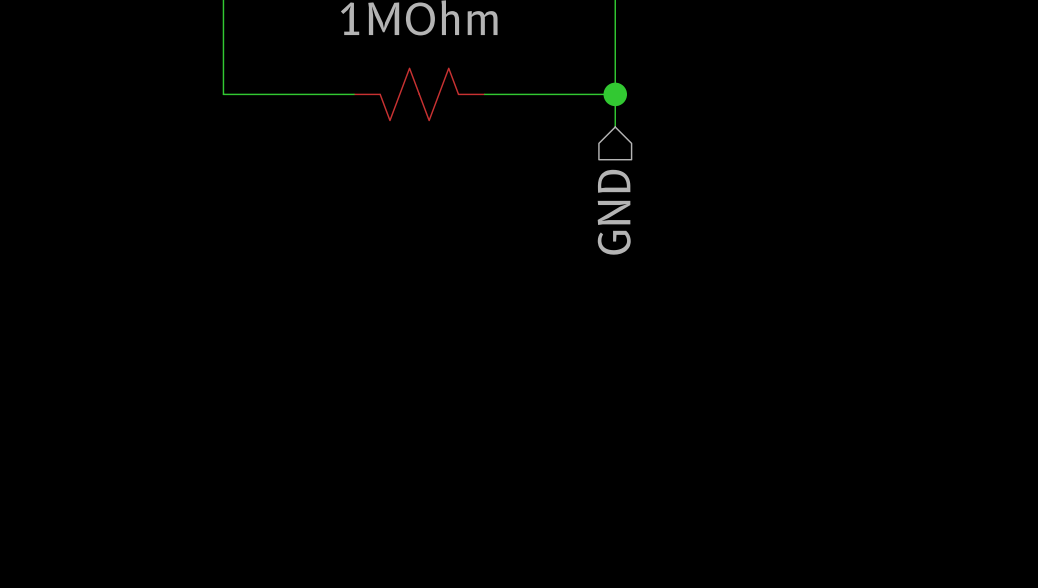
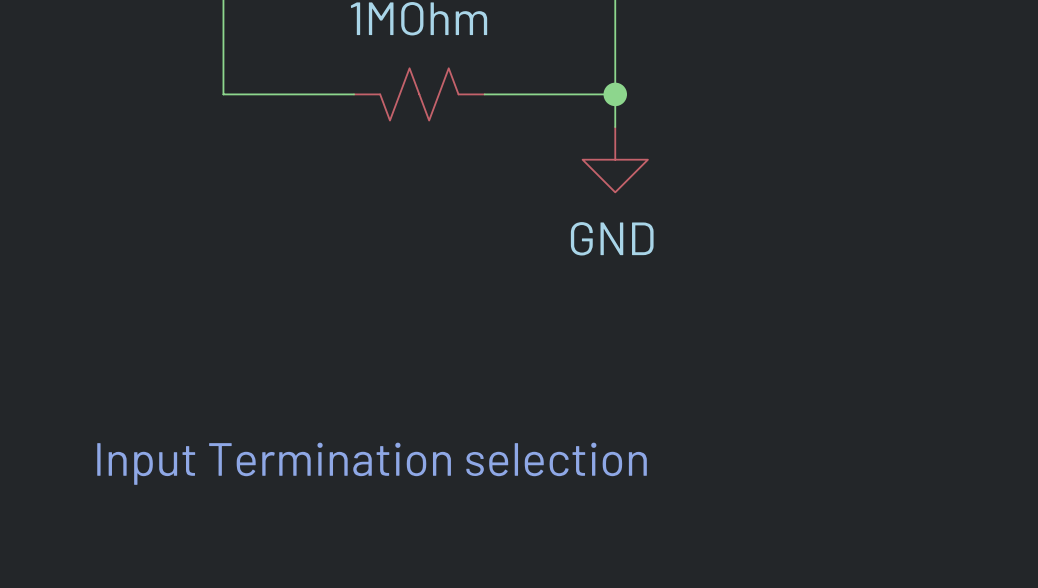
power symbol: none -> GND (615, 159)
hierarchical label: GND (614, 212) -> none
text: none -> Input Termination selection (372, 463)

